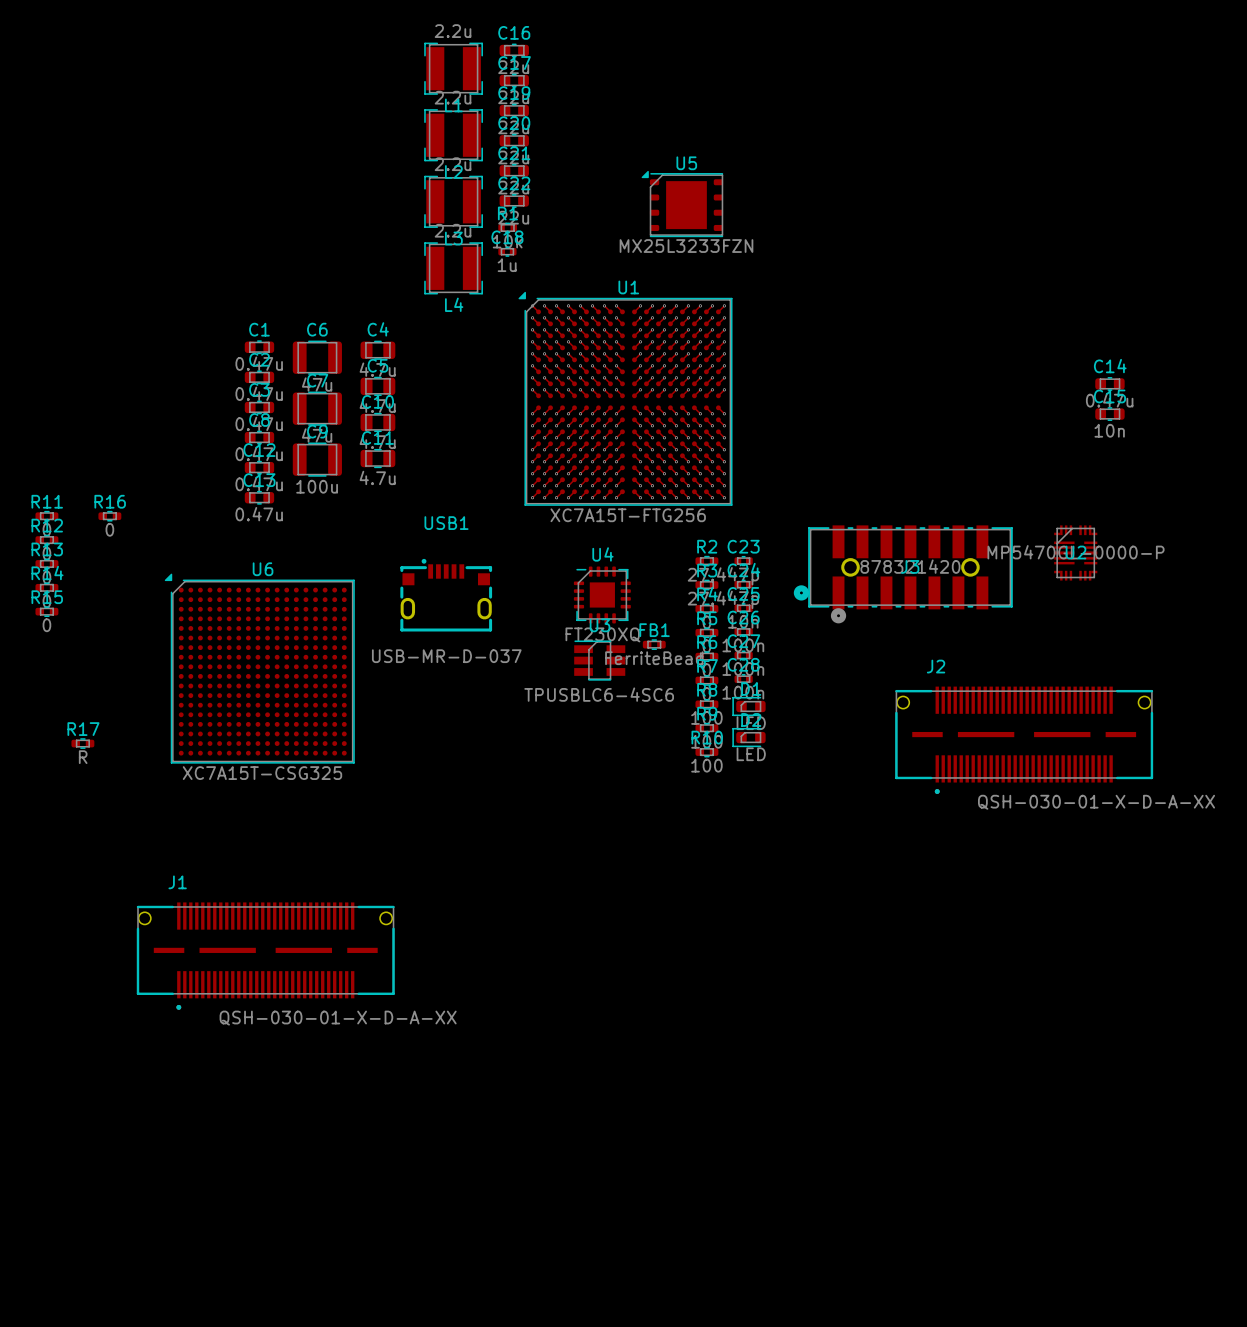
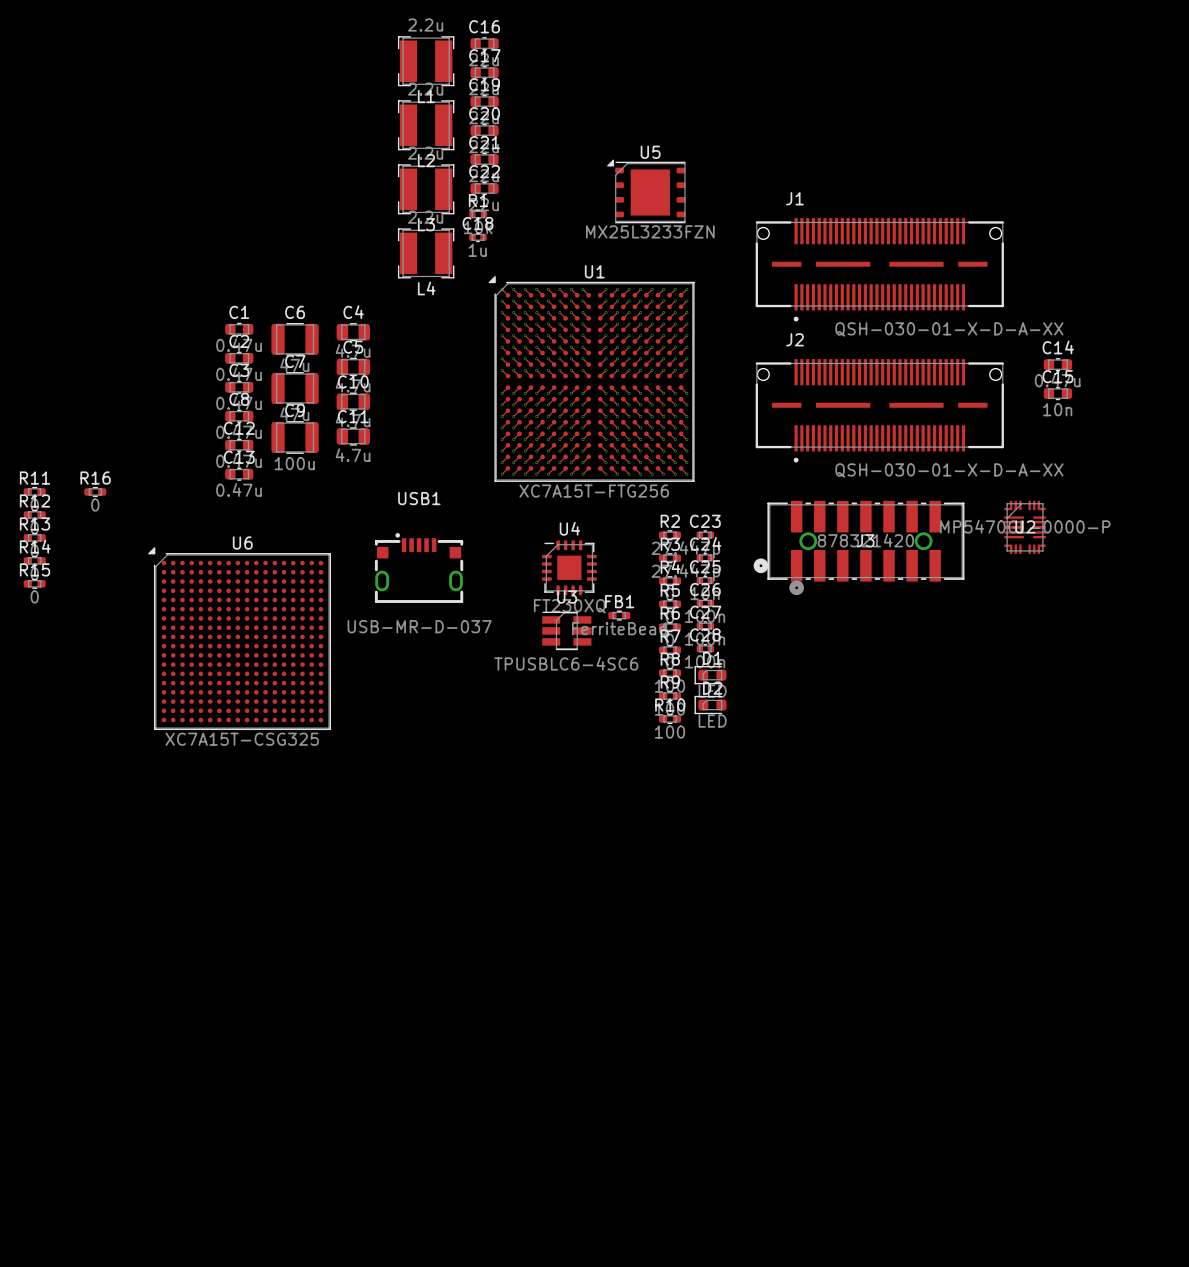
J2 position: (1024, 740) -> (879, 410)
R17: R (82, 743) -> none
J1 position: (265, 956) -> (879, 269)

